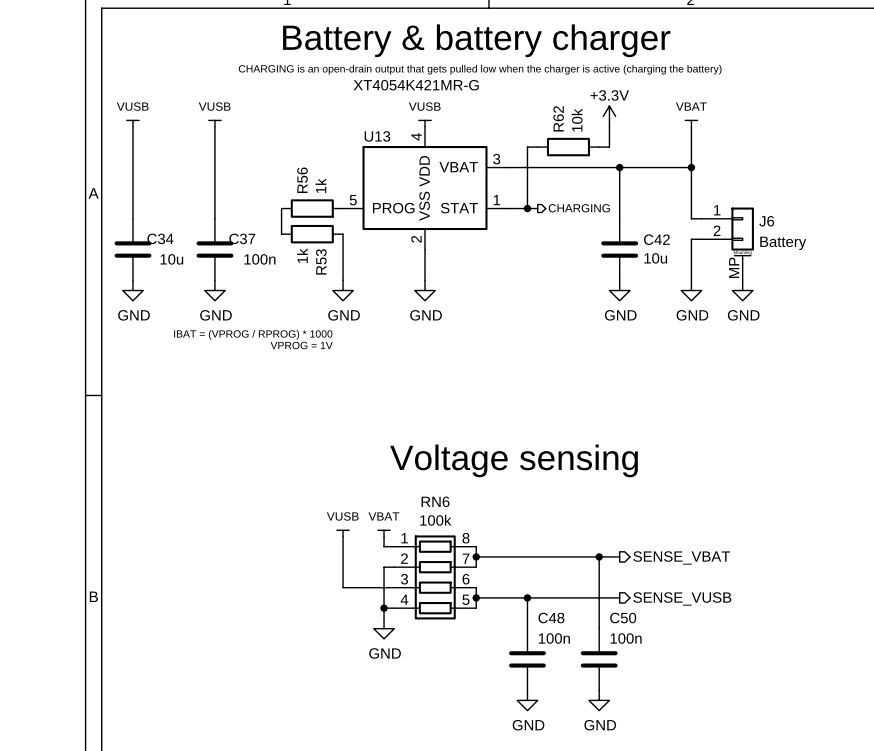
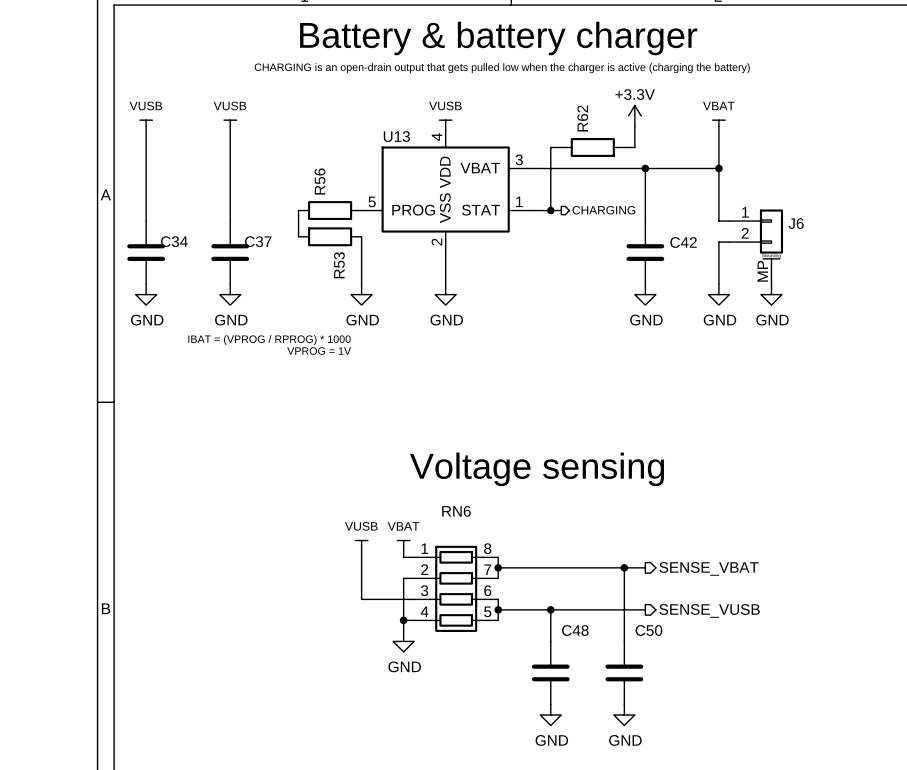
U13 value: XT4054K421MR-G (416, 85) -> none
R62 value: 10k (577, 120) -> none
R56 value: 1k (320, 185) -> none
J6 value: Battery (783, 243) -> none
R53 value: 1k (302, 255) -> none
C42 value: 10u (655, 258) -> none
C34 value: 10u (171, 259) -> none
C37 value: 100n (259, 259) -> none
RN6 value: 100k (435, 520) -> none
C48 value: 100n (554, 638) -> none
C50 value: 100n (626, 638) -> none

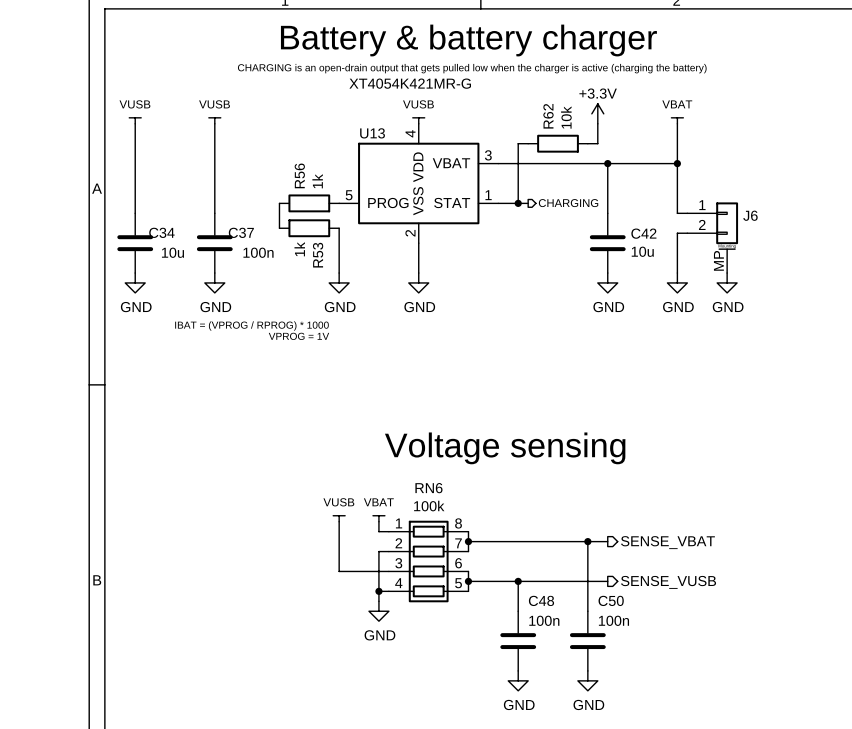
U13 value: none -> XT4054K421MR-G (410, 83)
R62 value: none -> 10k (566, 117)
R56 value: none -> 1k (317, 181)
R53 value: none -> 1k (299, 249)
C42 value: none -> 10u (642, 251)
C34 value: none -> 10u (172, 252)
C37 value: none -> 100n (258, 252)
RN6 value: none -> 100k (429, 506)
C48 value: none -> 100n (544, 620)
C50 value: none -> 100n (613, 620)

